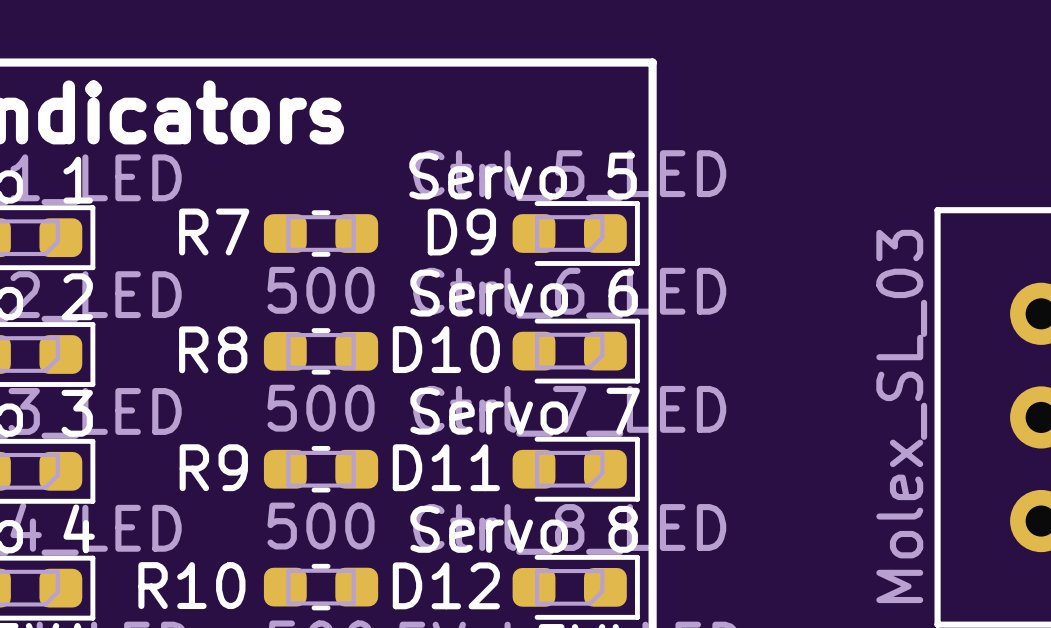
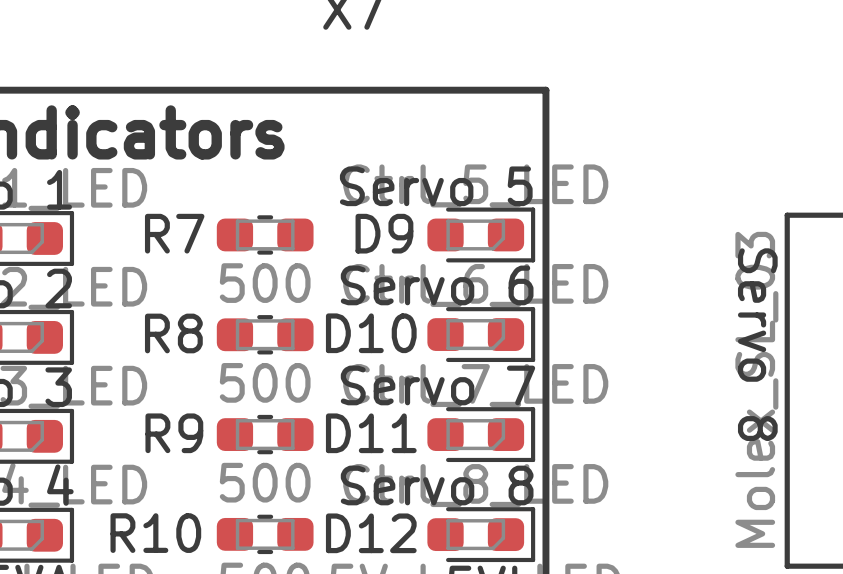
text: none -> Servo 8 (757, 344)

